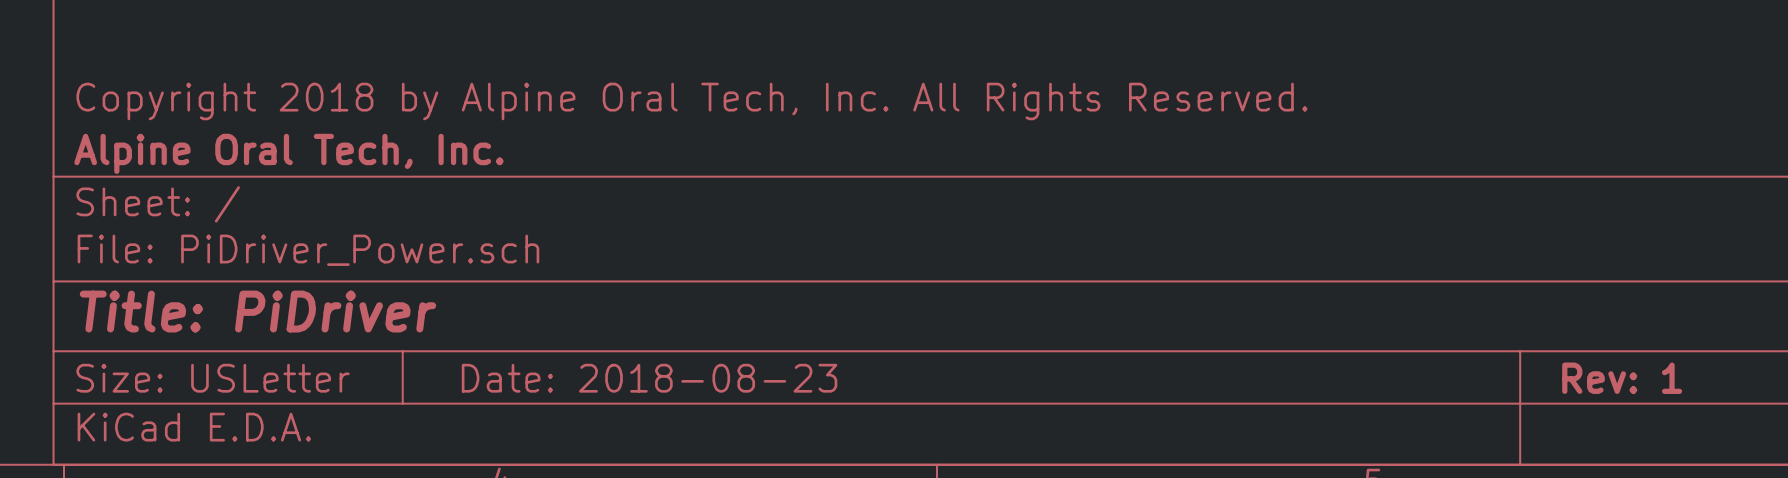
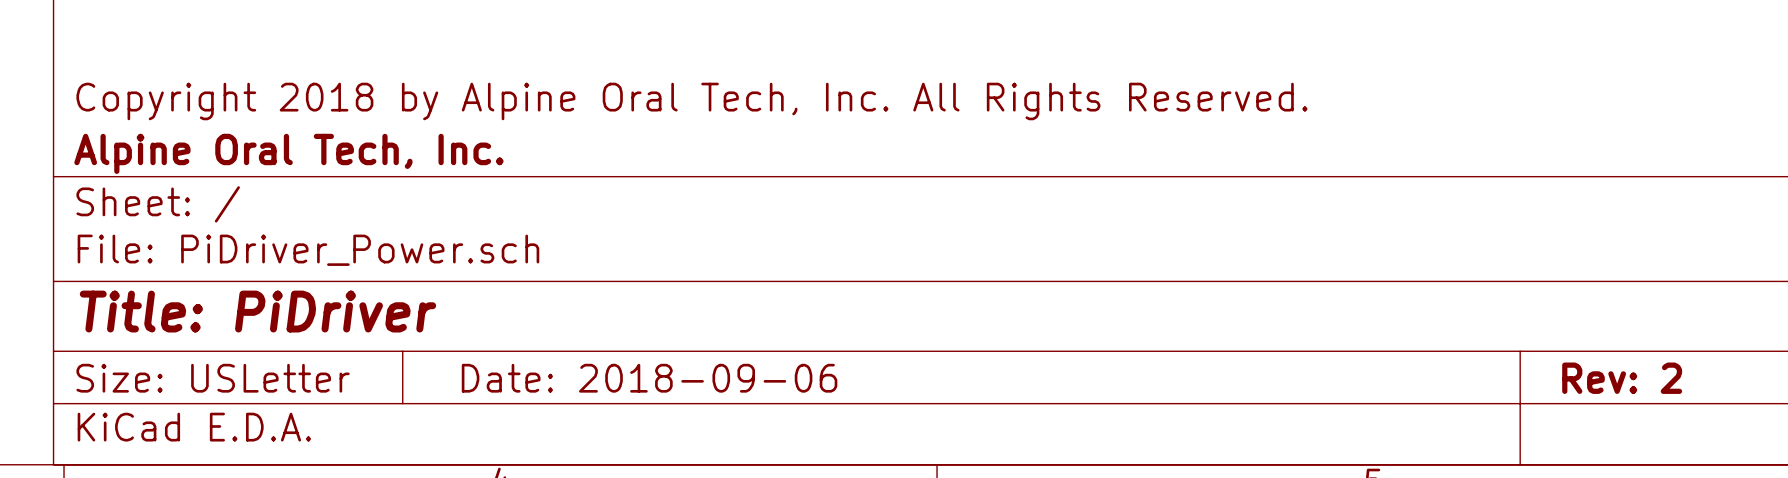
title block: Date: 2018-08-23 (649, 378) -> Date: 2018-09-06 (649, 378)
title block: Rev: 1 (1622, 378) -> Rev: 2 (1622, 378)

